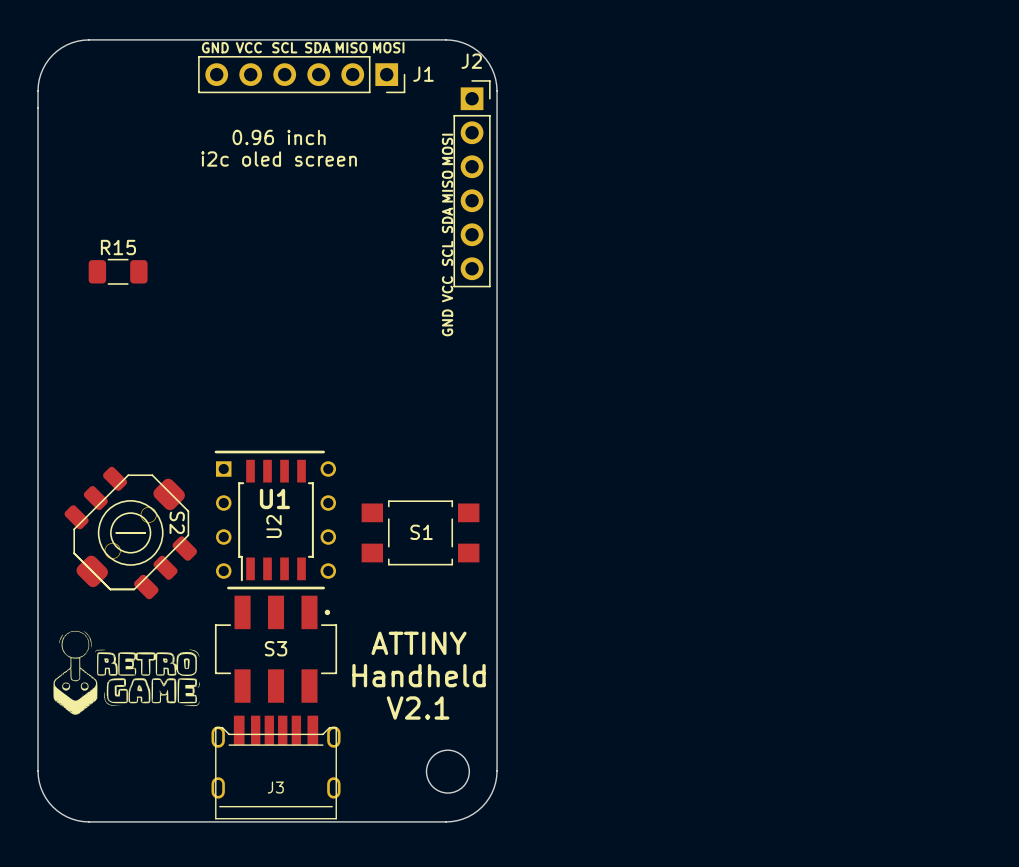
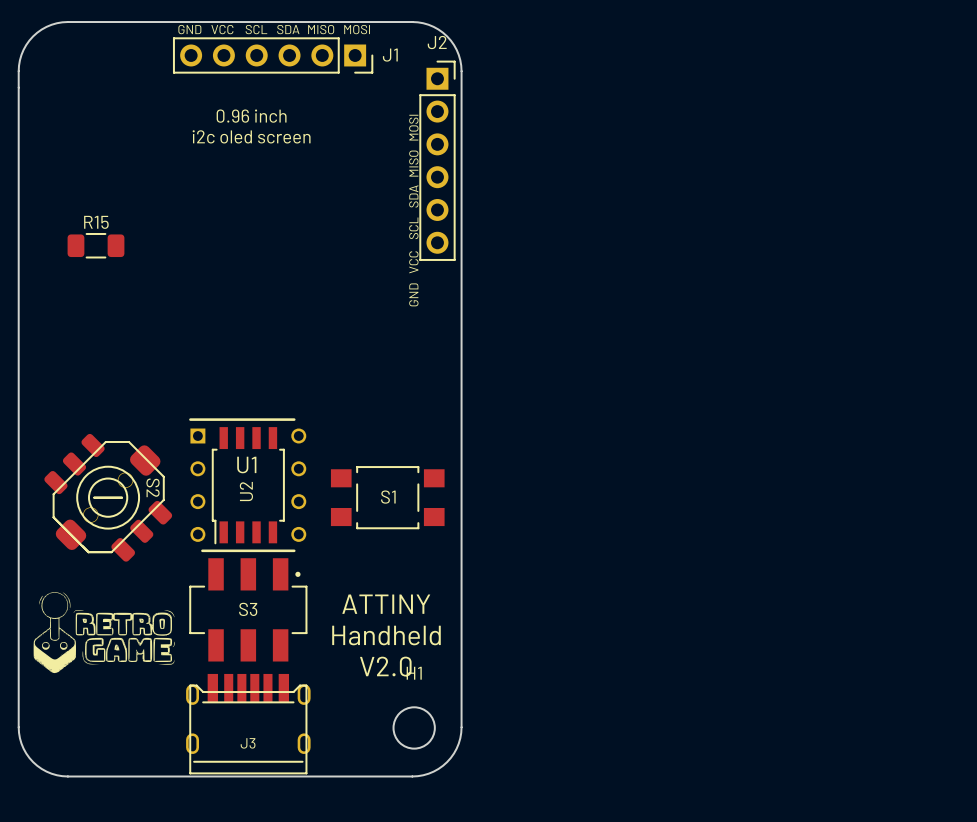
text: V2.1 (418, 708) -> V2.0 (385, 666)
H1 name: none -> H1 (414, 673)

